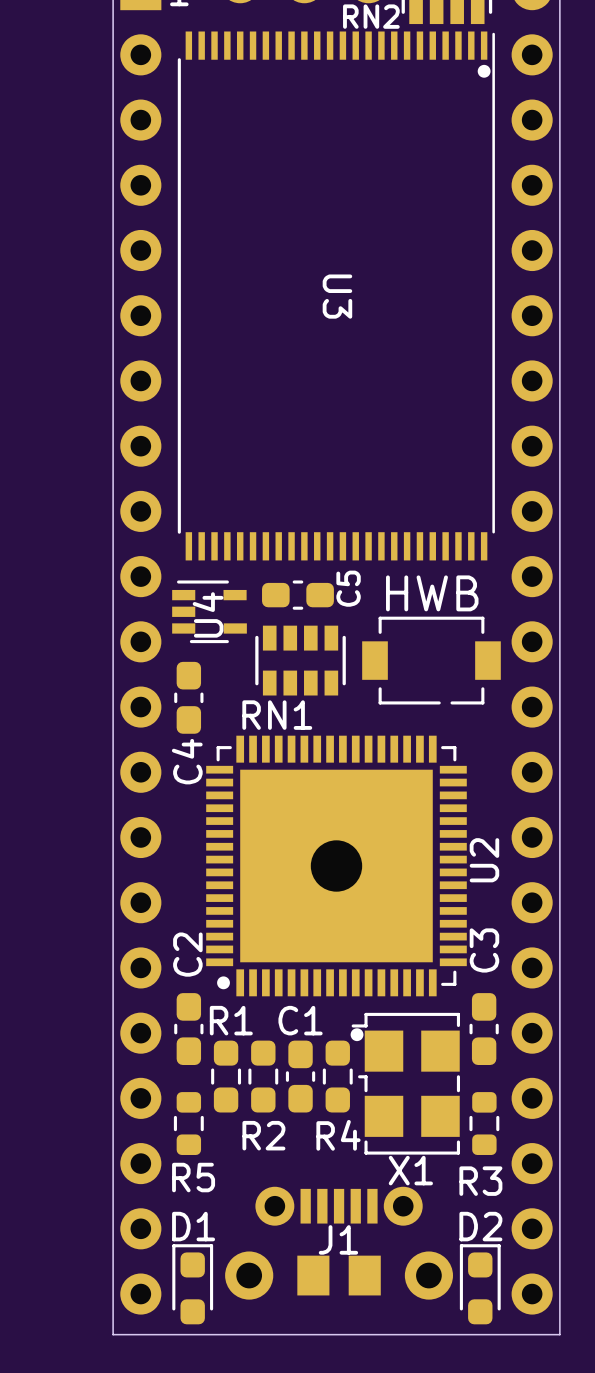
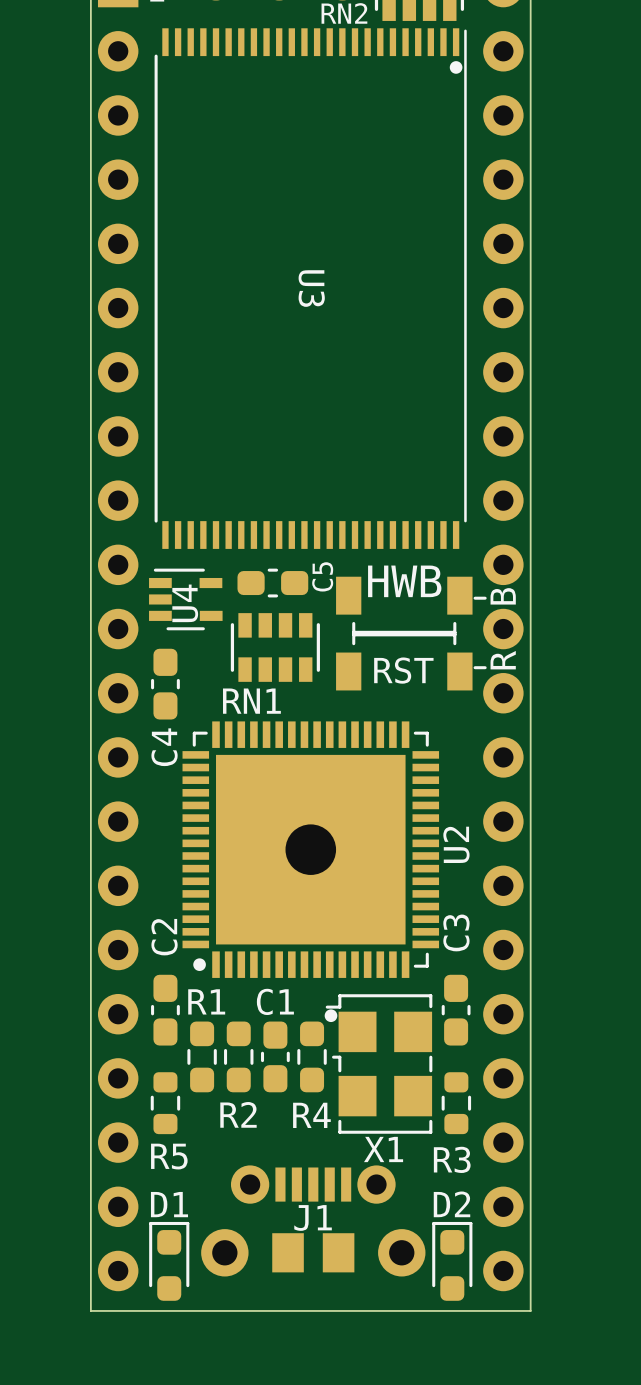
text: none -> B (503, 596)
line: none -> (475, 598) (485, 598)
part footprint: [362, 616, 501, 705] -> [336, 630, 473, 691]
part: none -> (404, 606)
text: none -> R (503, 660)
line: none -> (475, 667) (485, 667)
text: none -> RST (403, 670)

